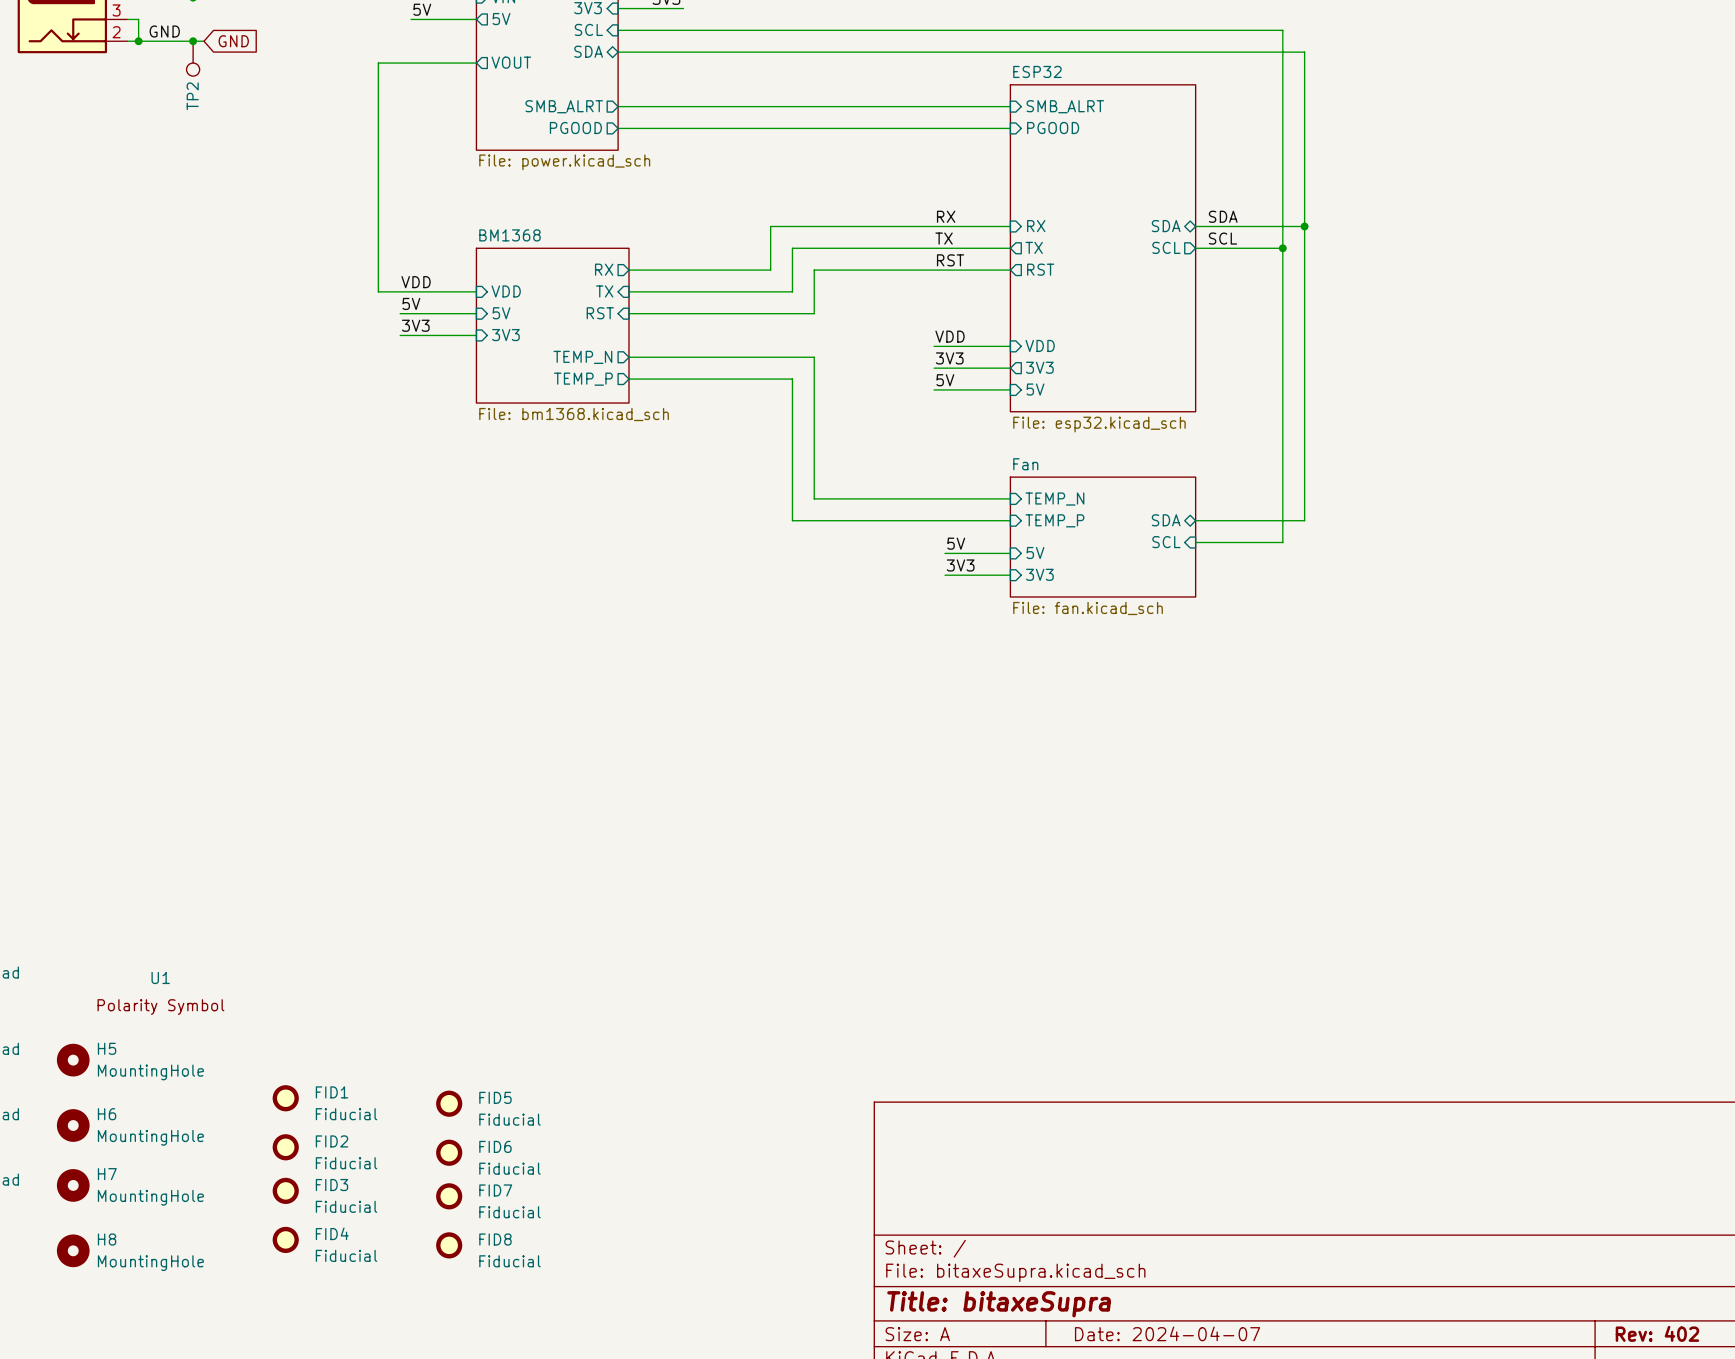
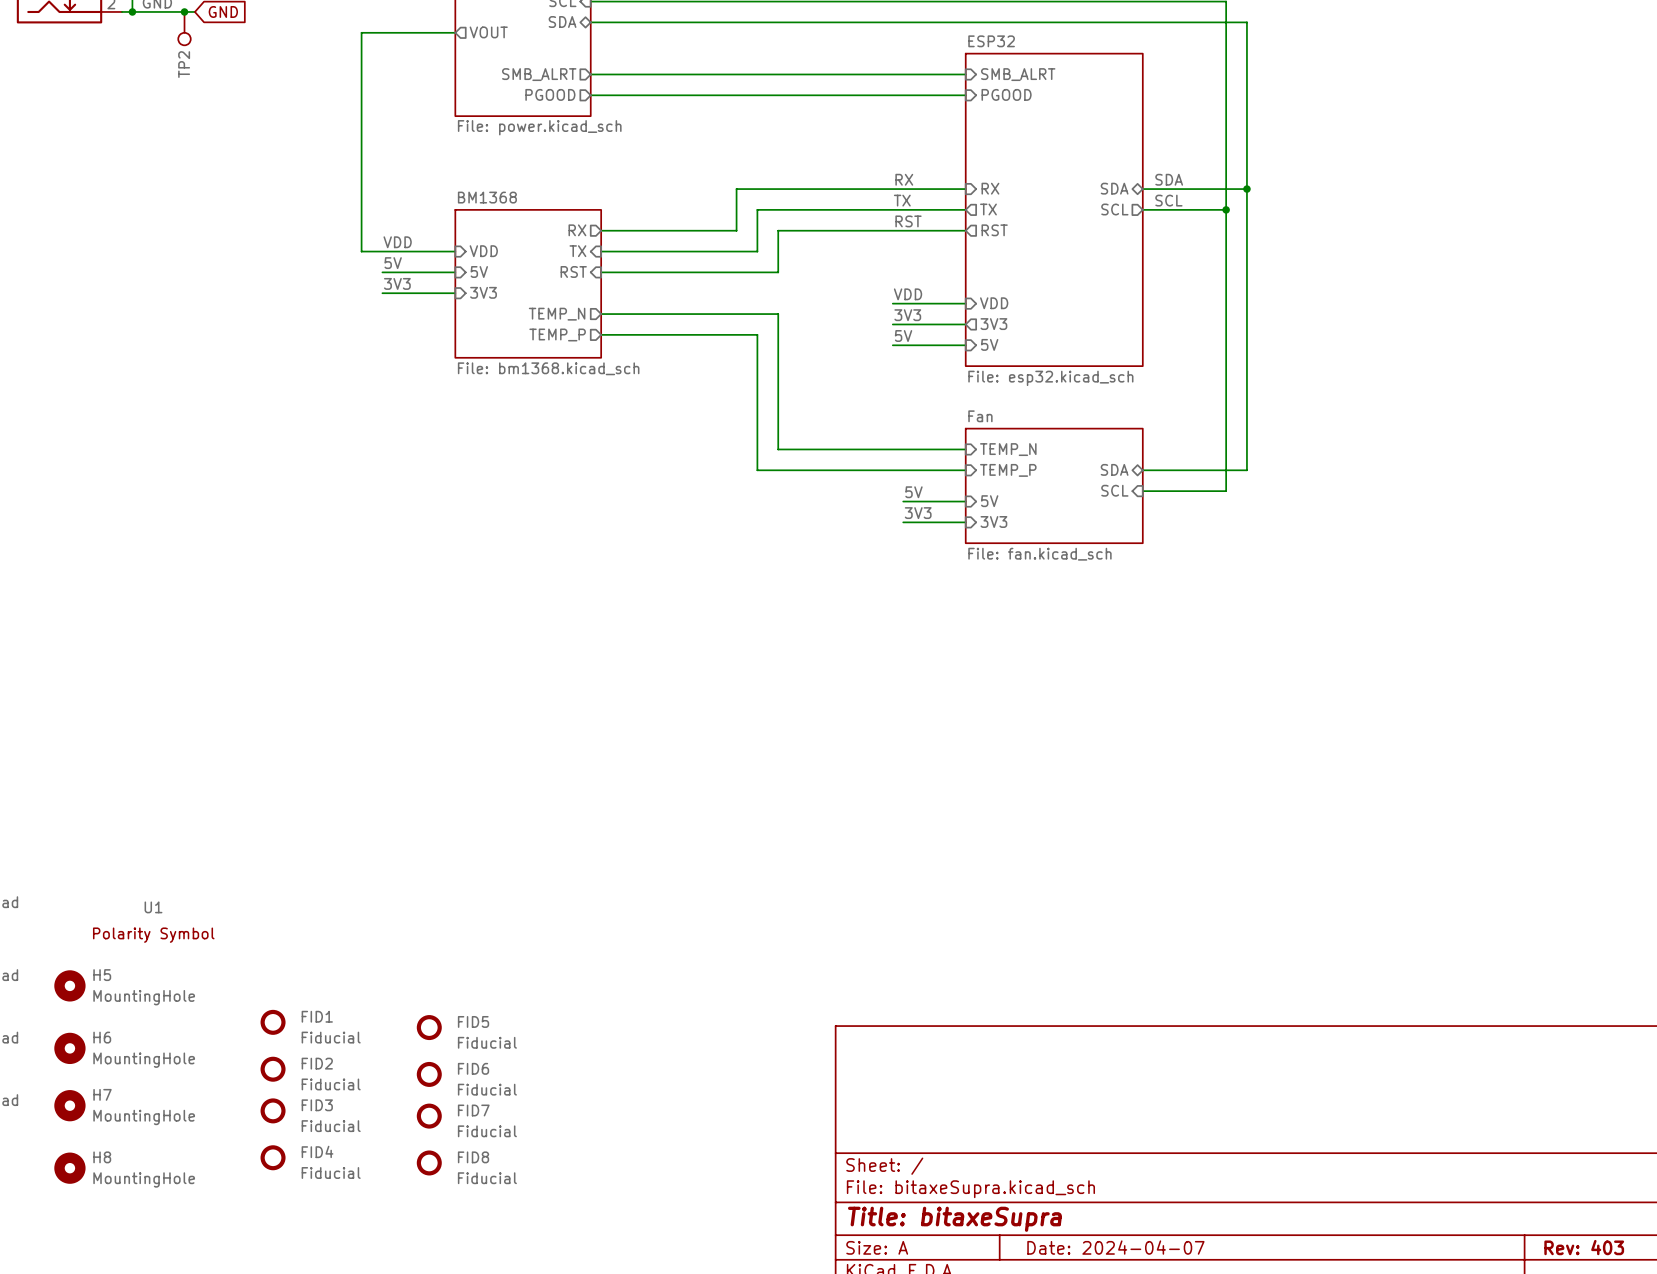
title block: Rev: 402 (1657, 1333) -> Rev: 403 (1584, 1247)

